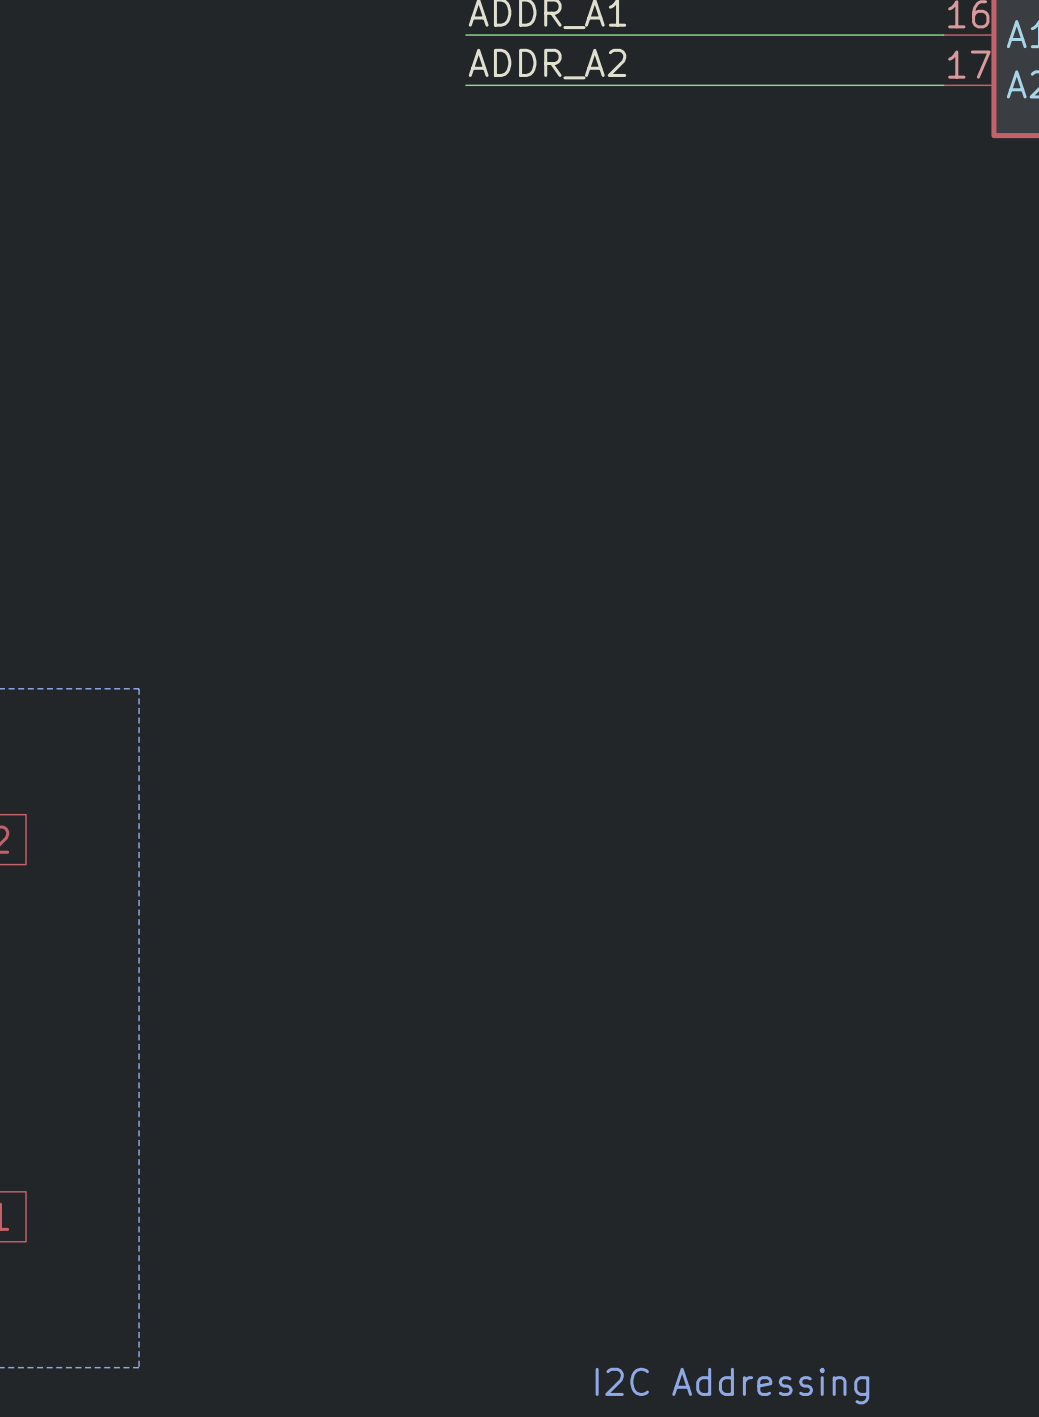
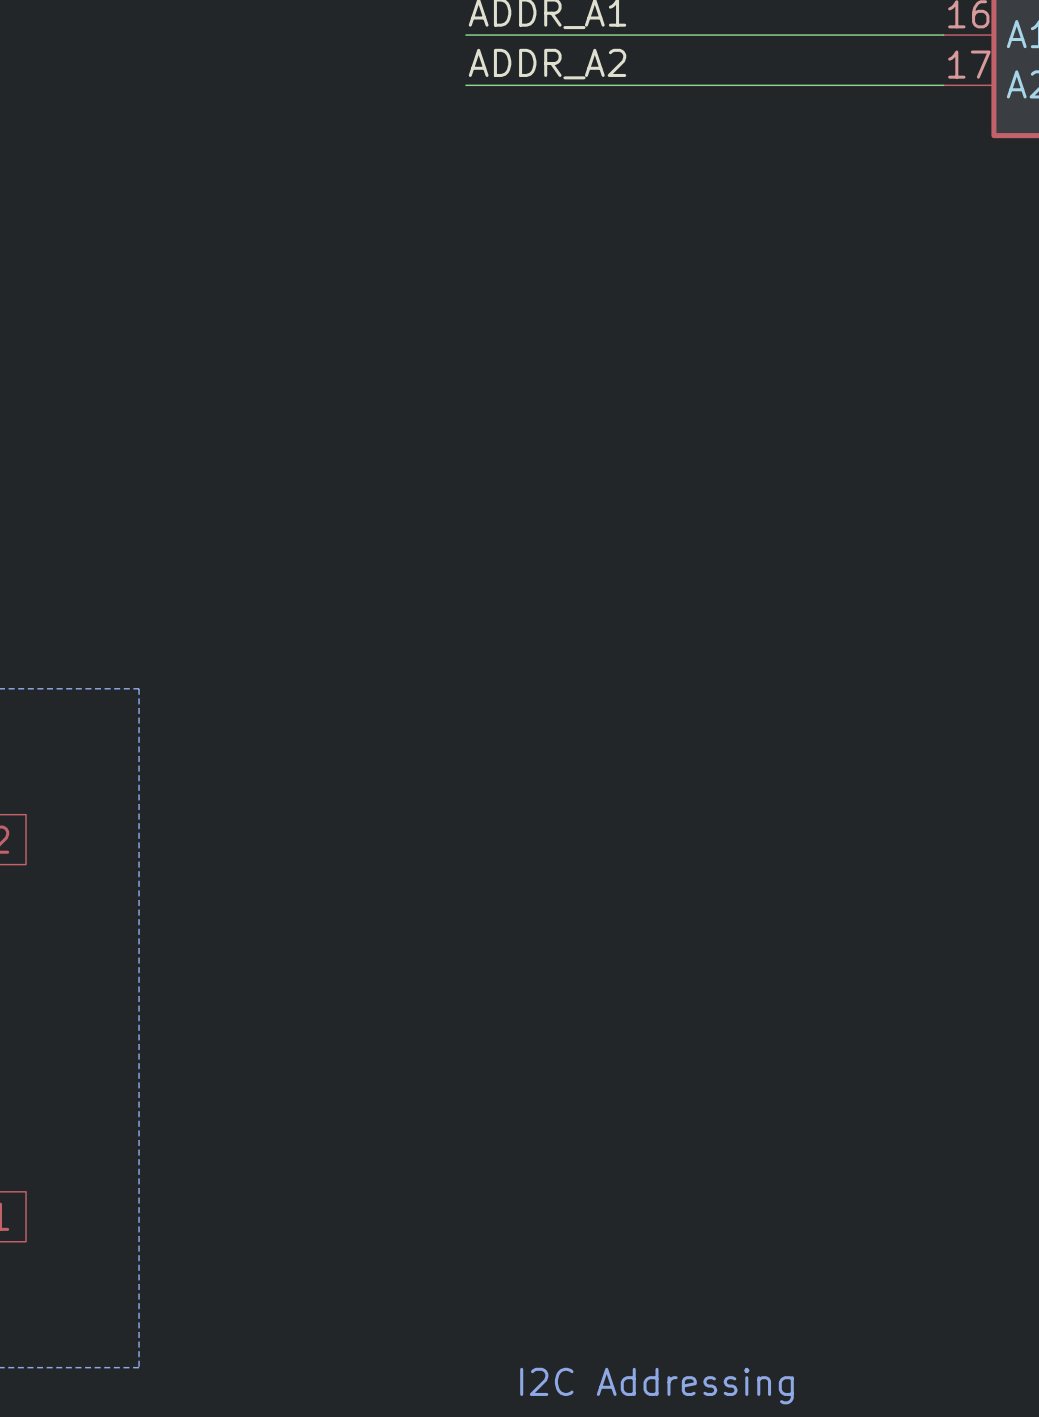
text position: I2C Addressing (732, 1386) -> I2C Addressing (657, 1386)

